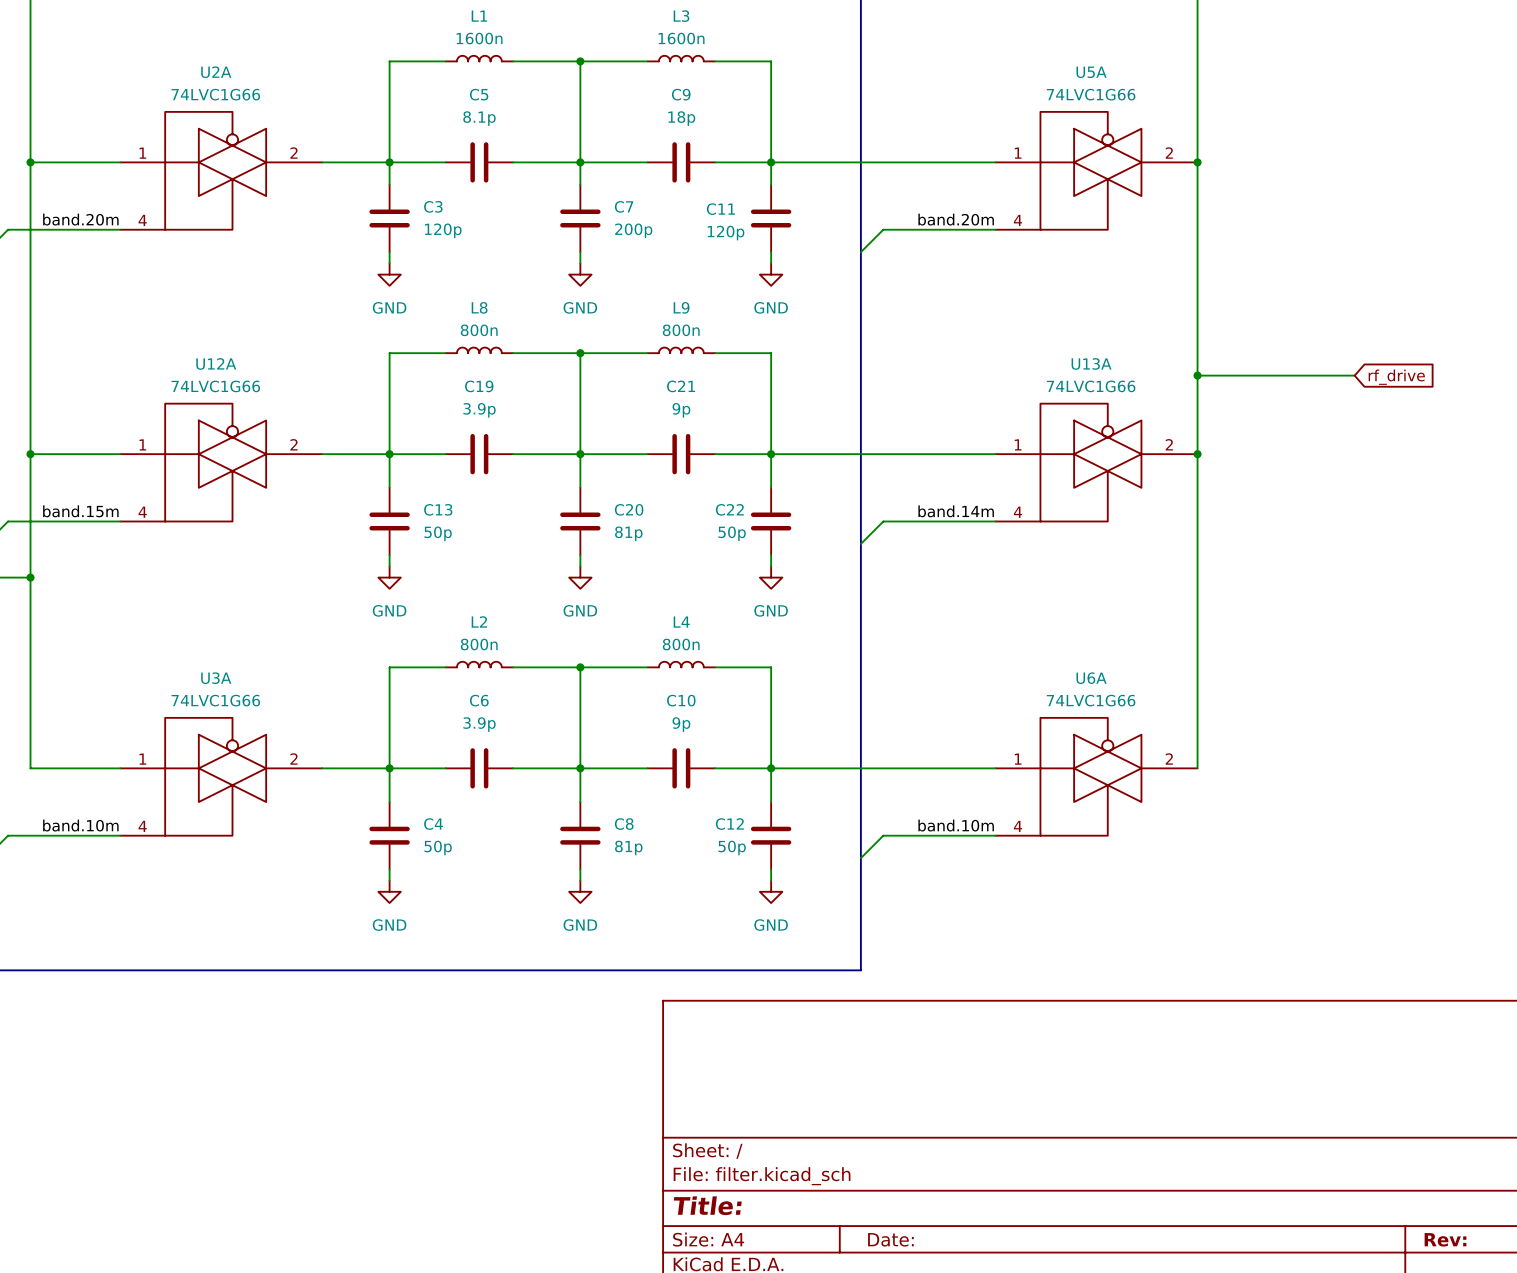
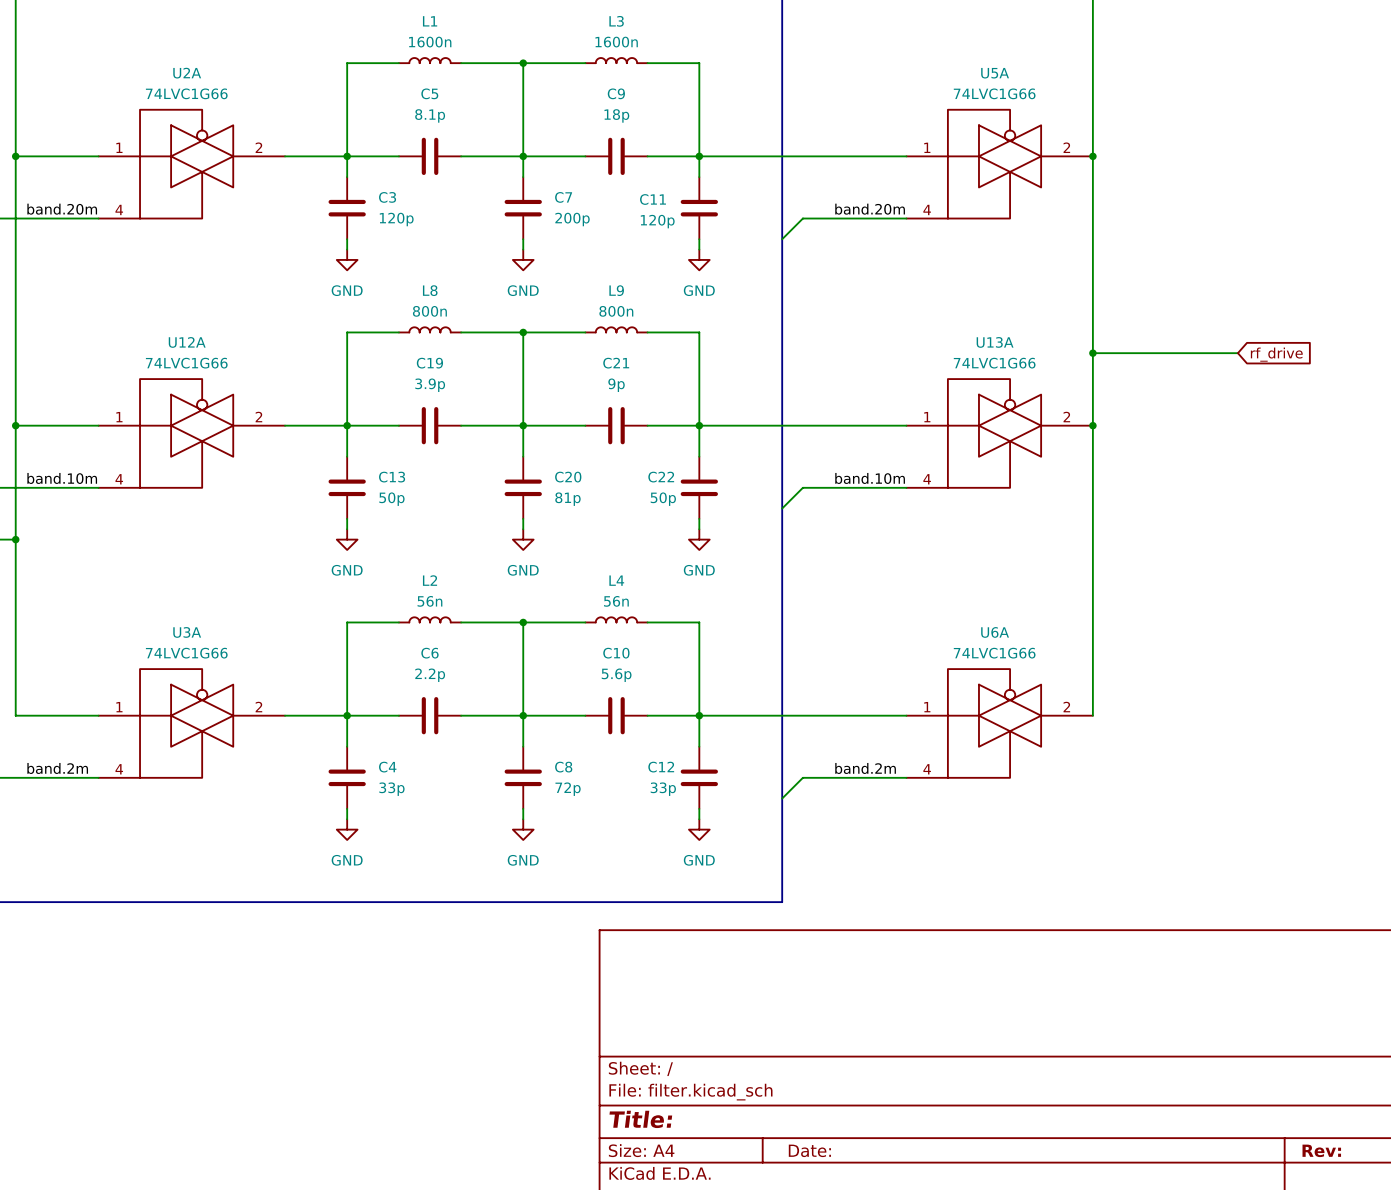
label: band.15m (80, 511) -> band.10m (62, 478)
label: band.14m (956, 511) -> band.10m (870, 478)
L2 value: 800n (479, 644) -> 56n (429, 601)
L4 value: 800n (681, 644) -> 56n (616, 601)
C6 value: 3.9p (479, 724) -> 2.2p (430, 675)
C10 value: 9p (681, 724) -> 5.6p (616, 675)
label: band.10m (80, 825) -> band.2m (57, 768)
label: band.10m (956, 825) -> band.2m (865, 768)
C4 value: 50p (438, 847) -> 33p (391, 789)
C8 value: 81p (628, 847) -> 72p (568, 789)
C12 value: 50p (732, 847) -> 33p (663, 789)

